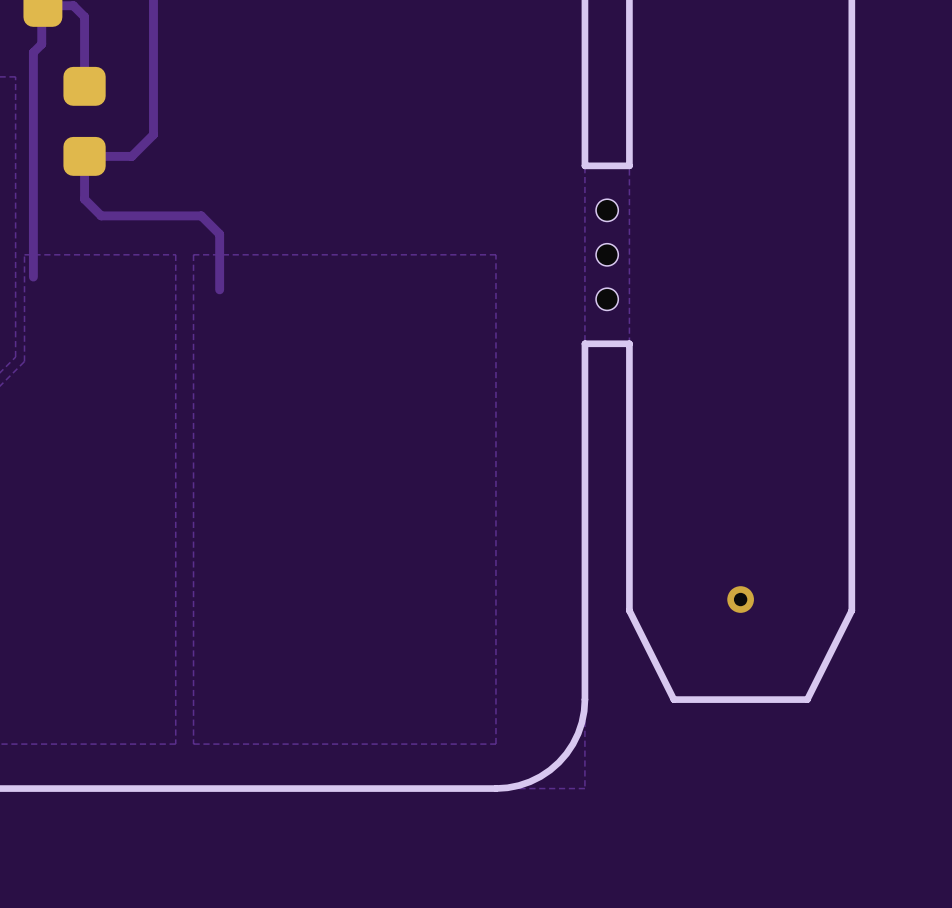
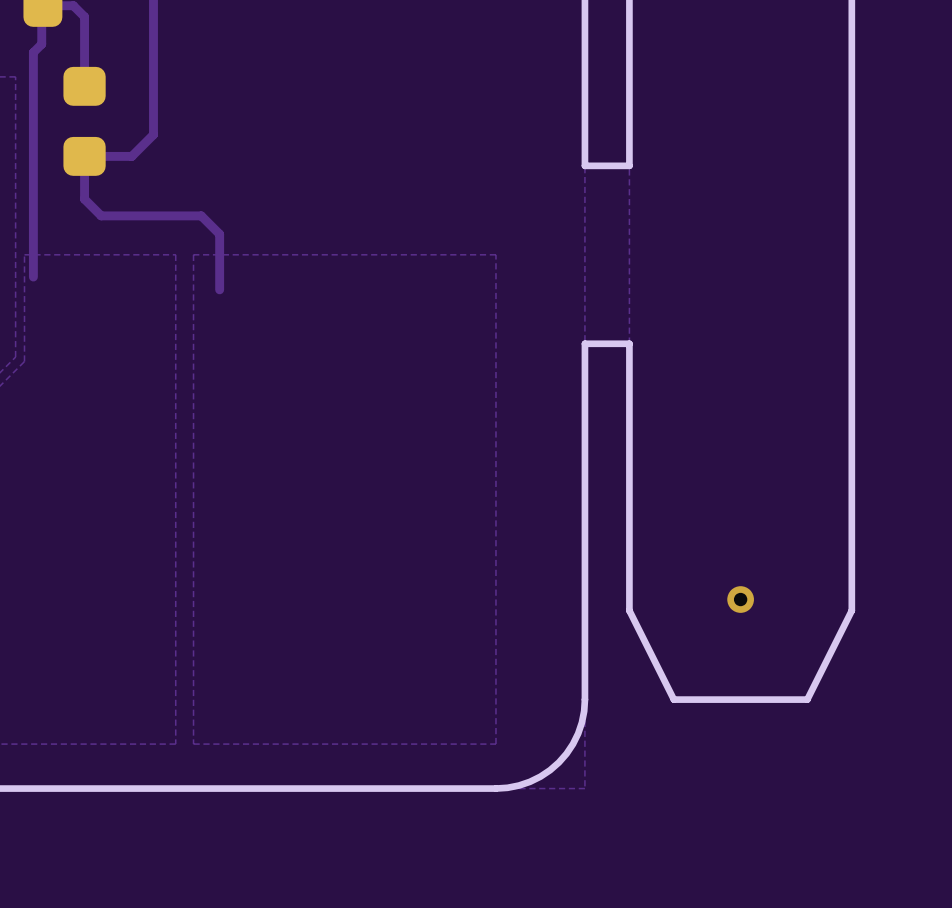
part: (607, 210) -> none
part: (607, 254) -> none
part: (607, 299) -> none

